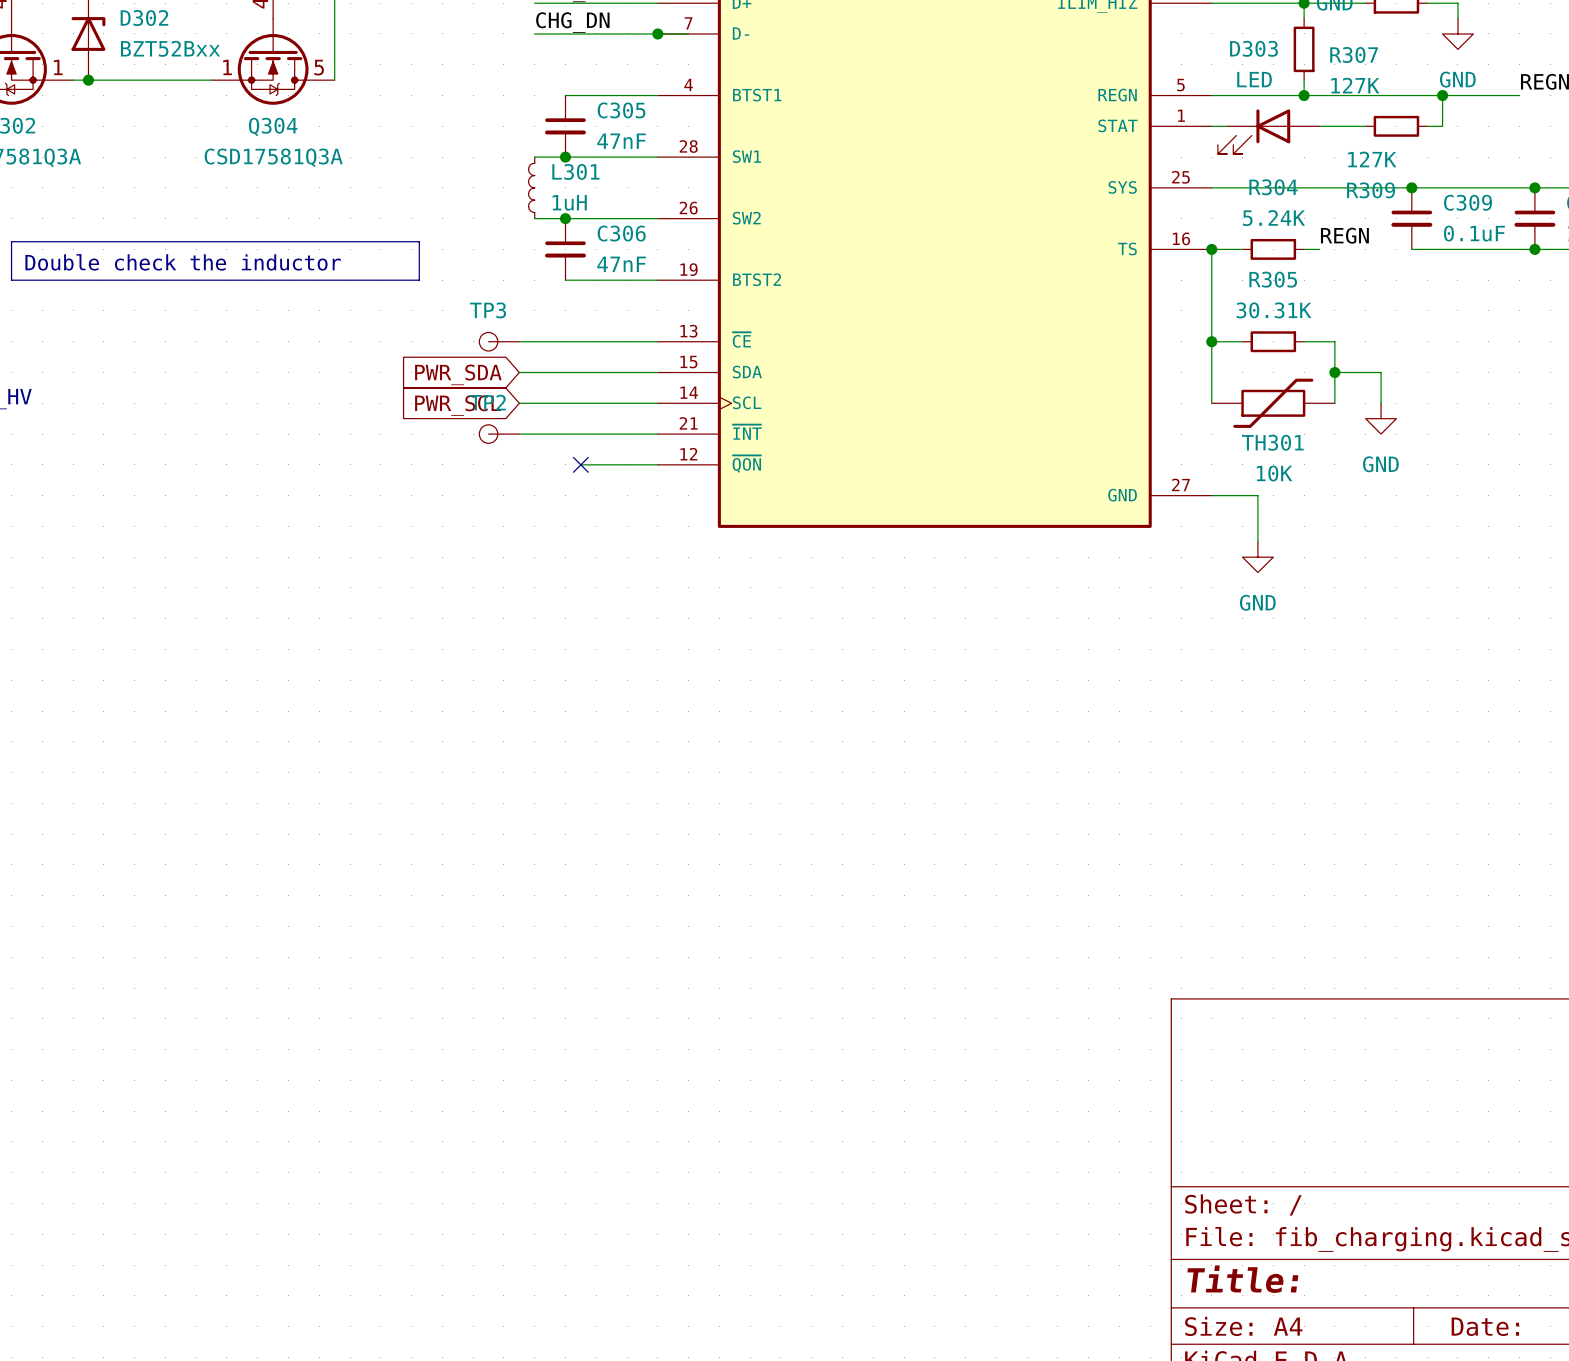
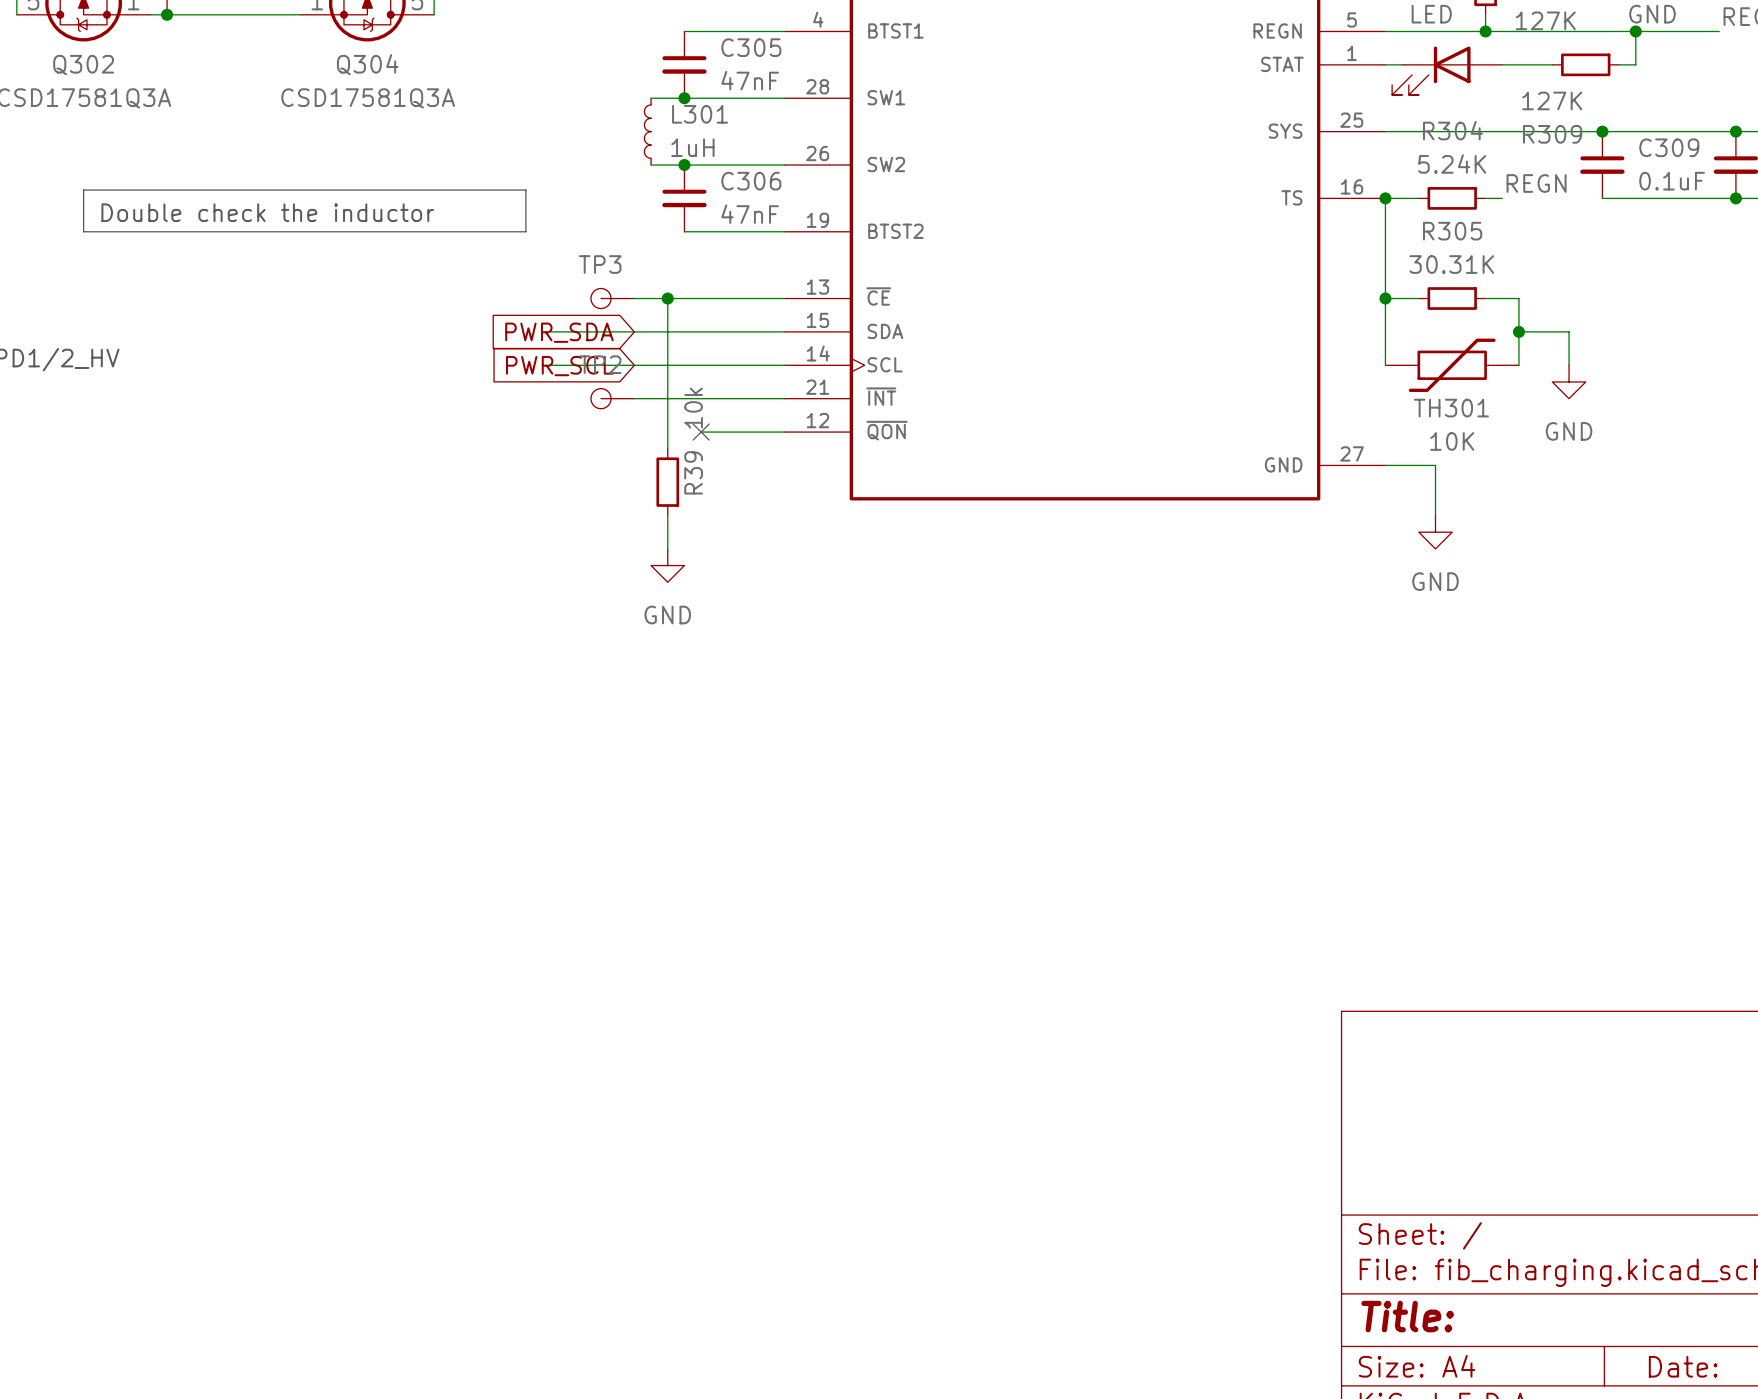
wire: none -> (667, 298) (667, 448)
junction: none -> (667, 298)
wire: none -> (550, 331) (634, 331)
wire: none -> (550, 365) (634, 365)
R39: none -> (667, 482)
wire: none -> (667, 515) (667, 548)
power symbol: none -> GND (667, 565)

